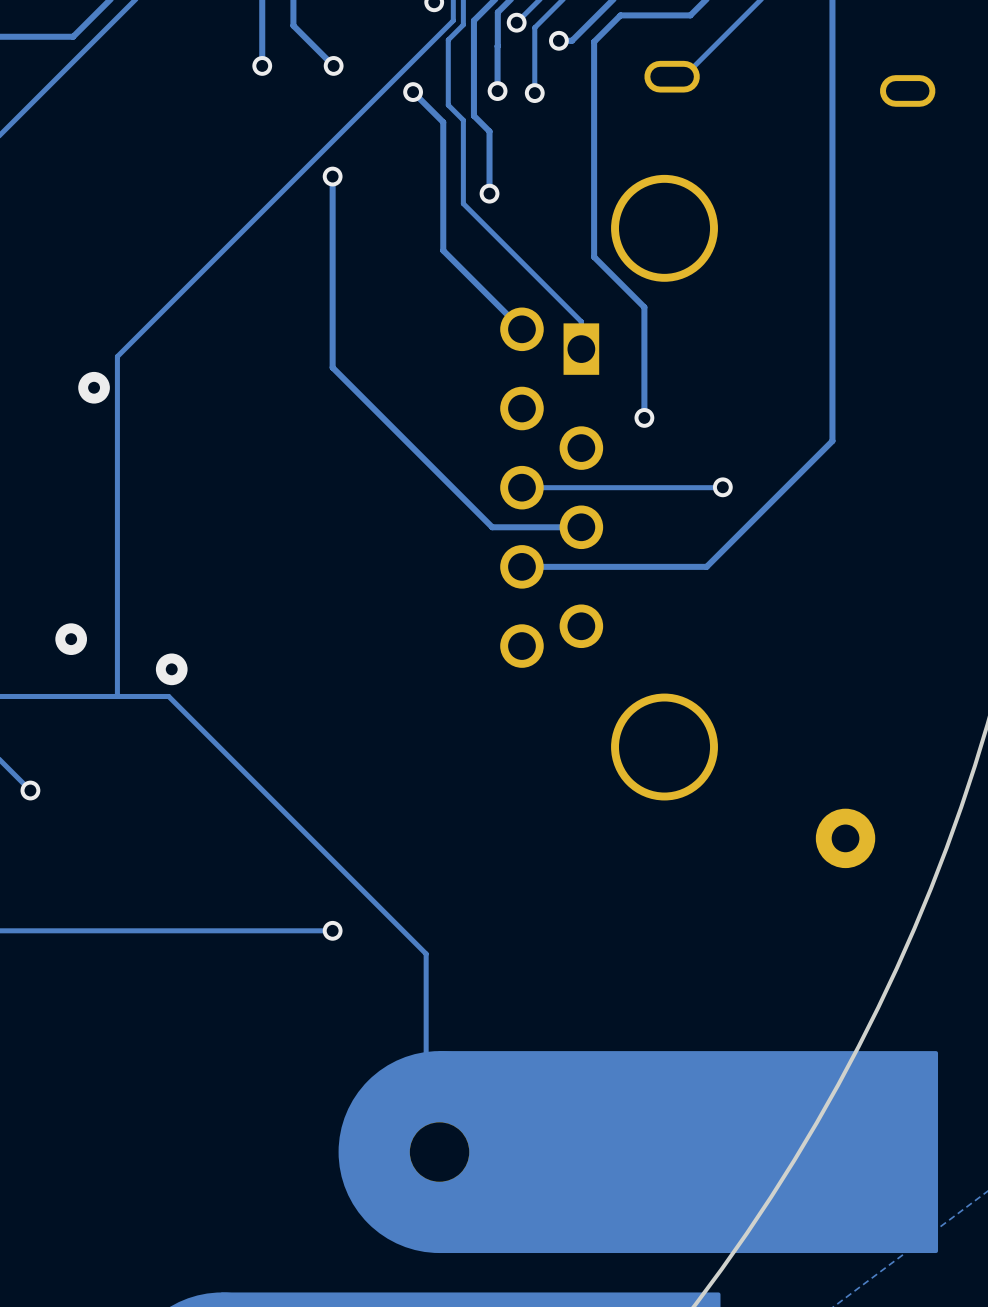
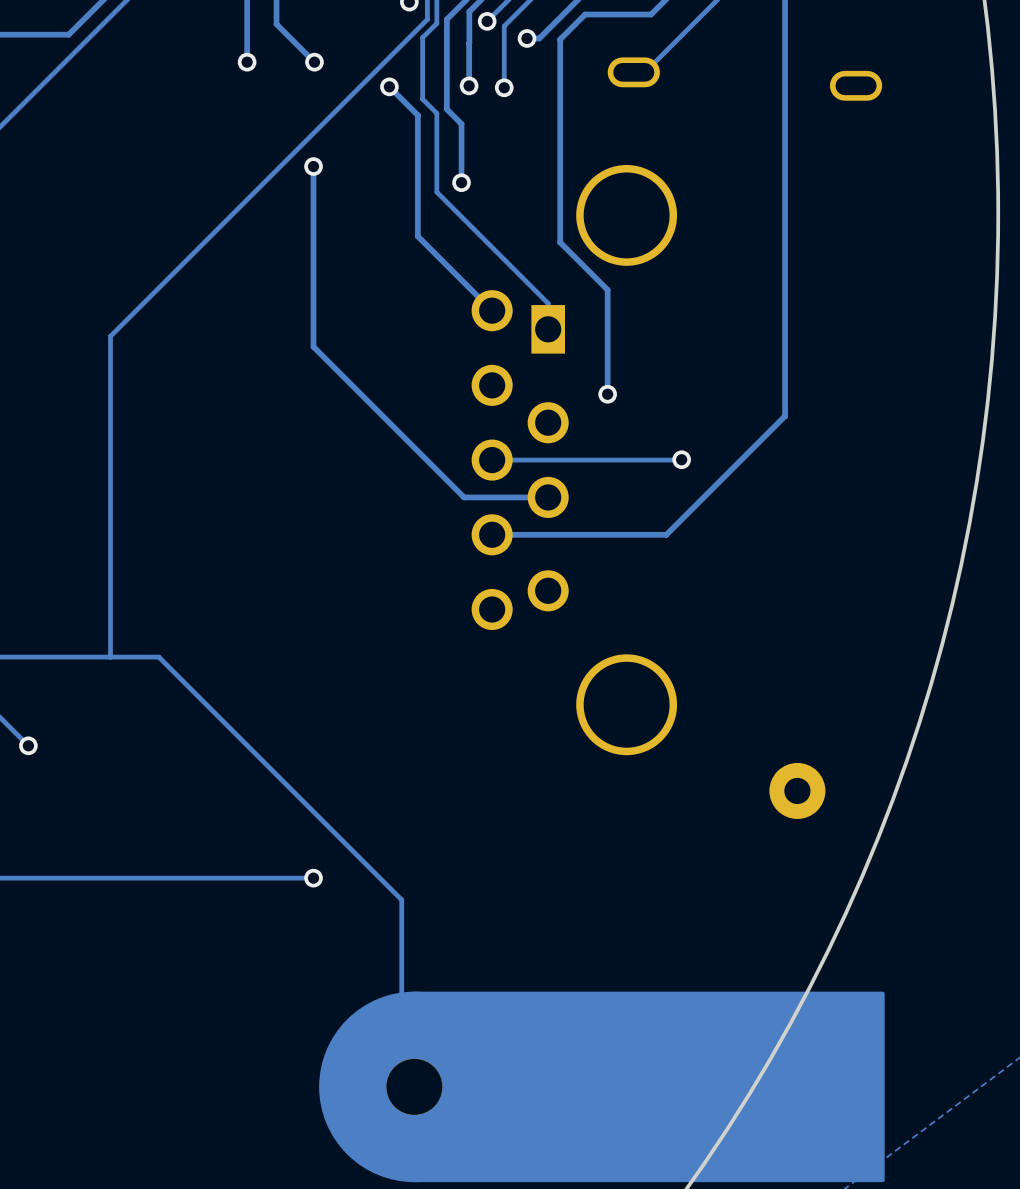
via: (94, 387) -> none
via: (71, 639) -> none
via: (171, 669) -> none

